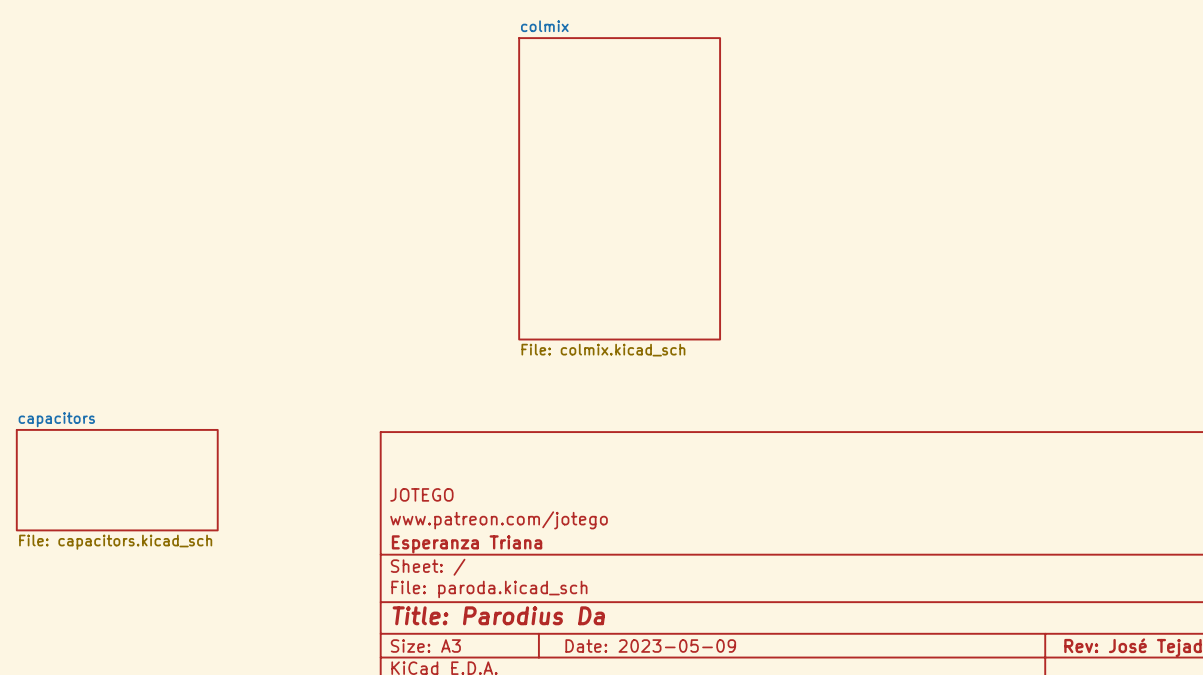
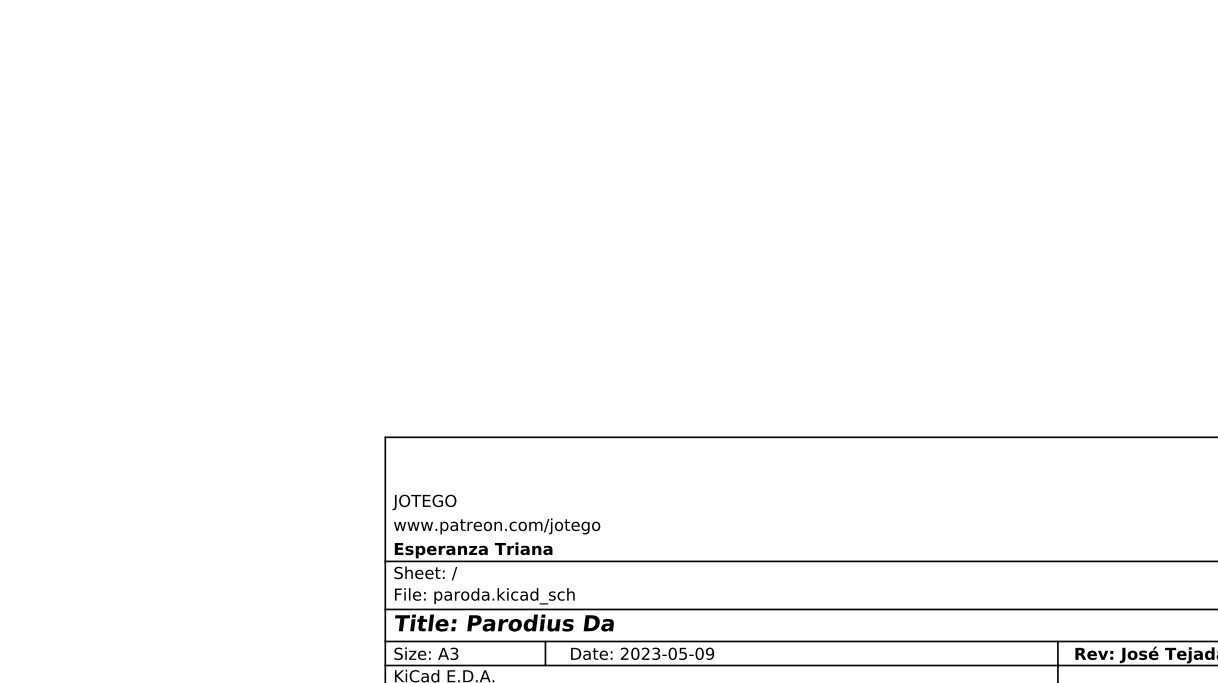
sheet colmix: File: colmix.kicad_sch (619, 188) -> none
sheet capacitors: File: capacitors.kicad_sch (117, 480) -> none

